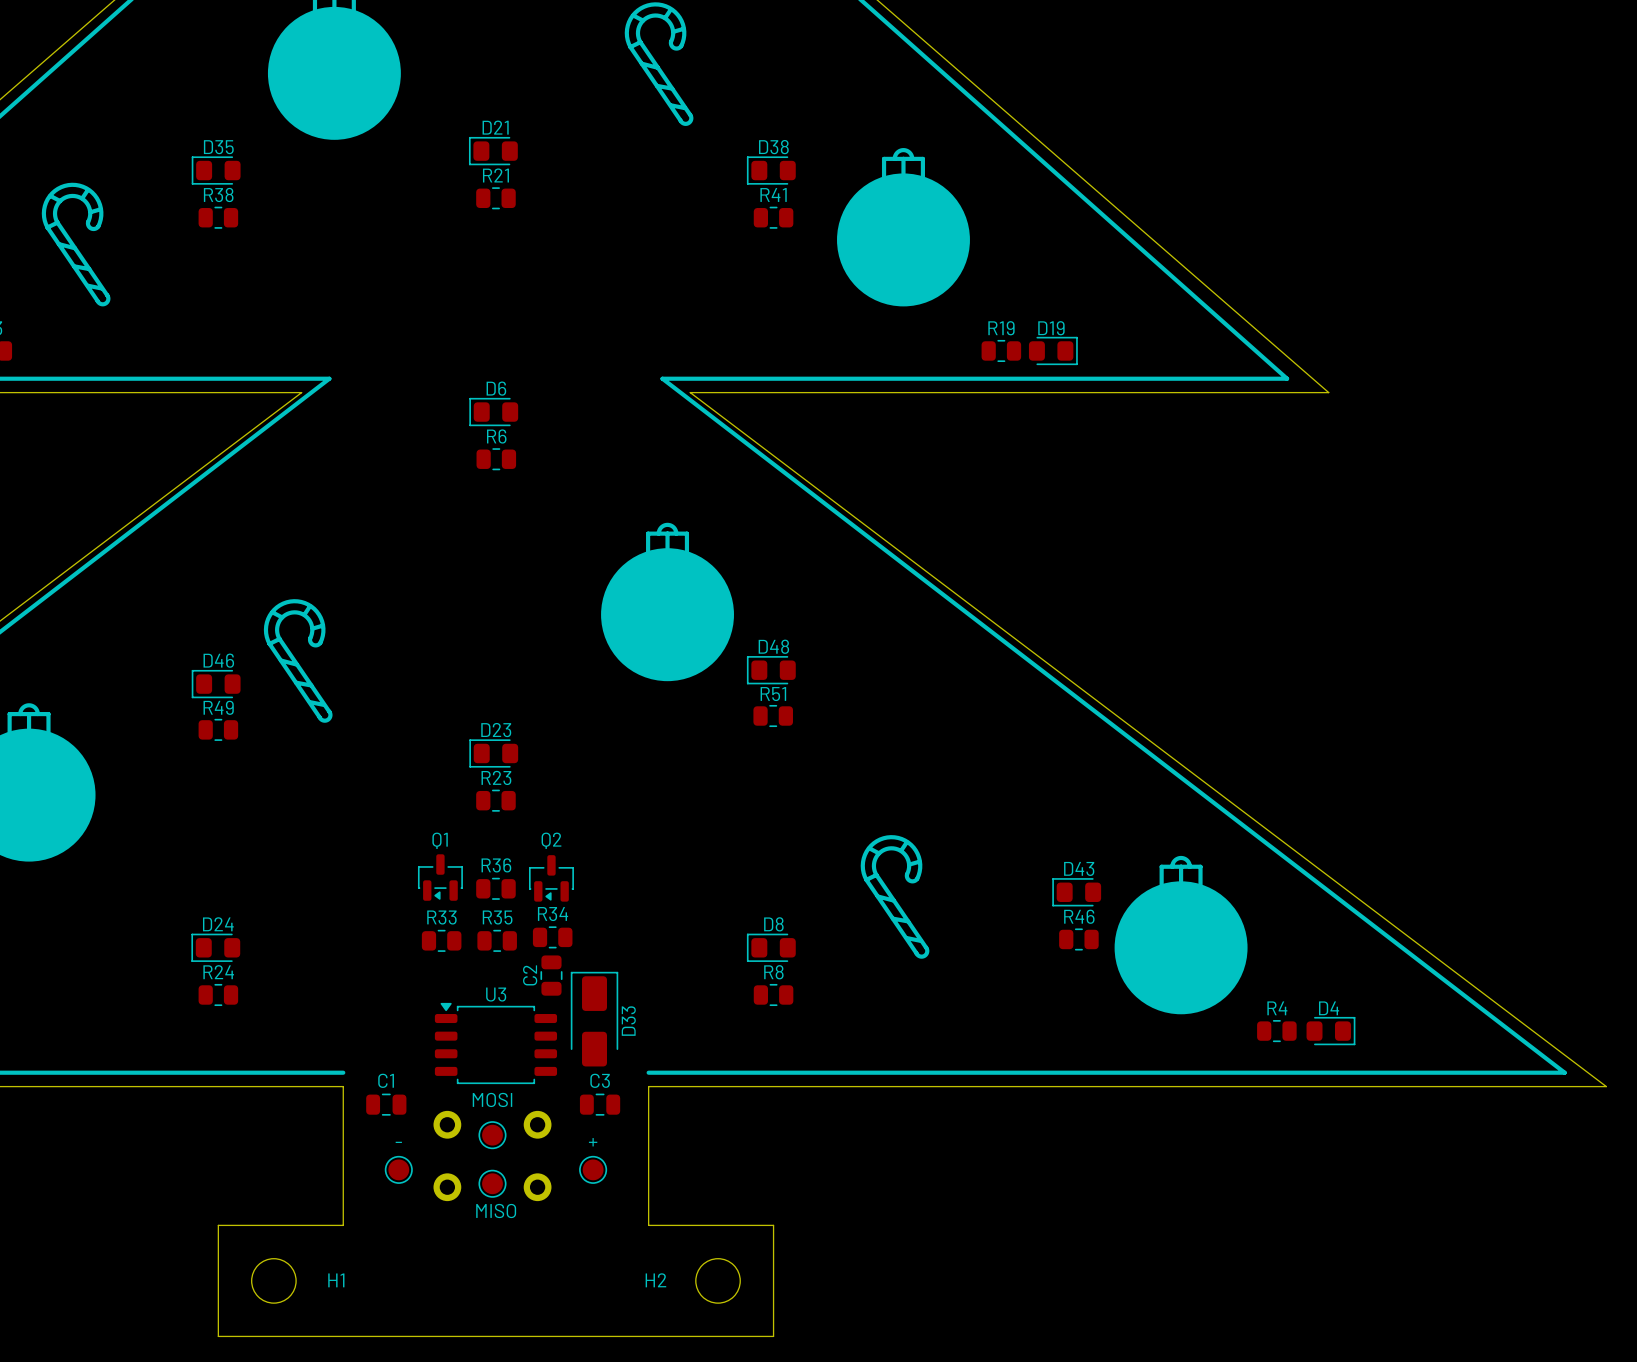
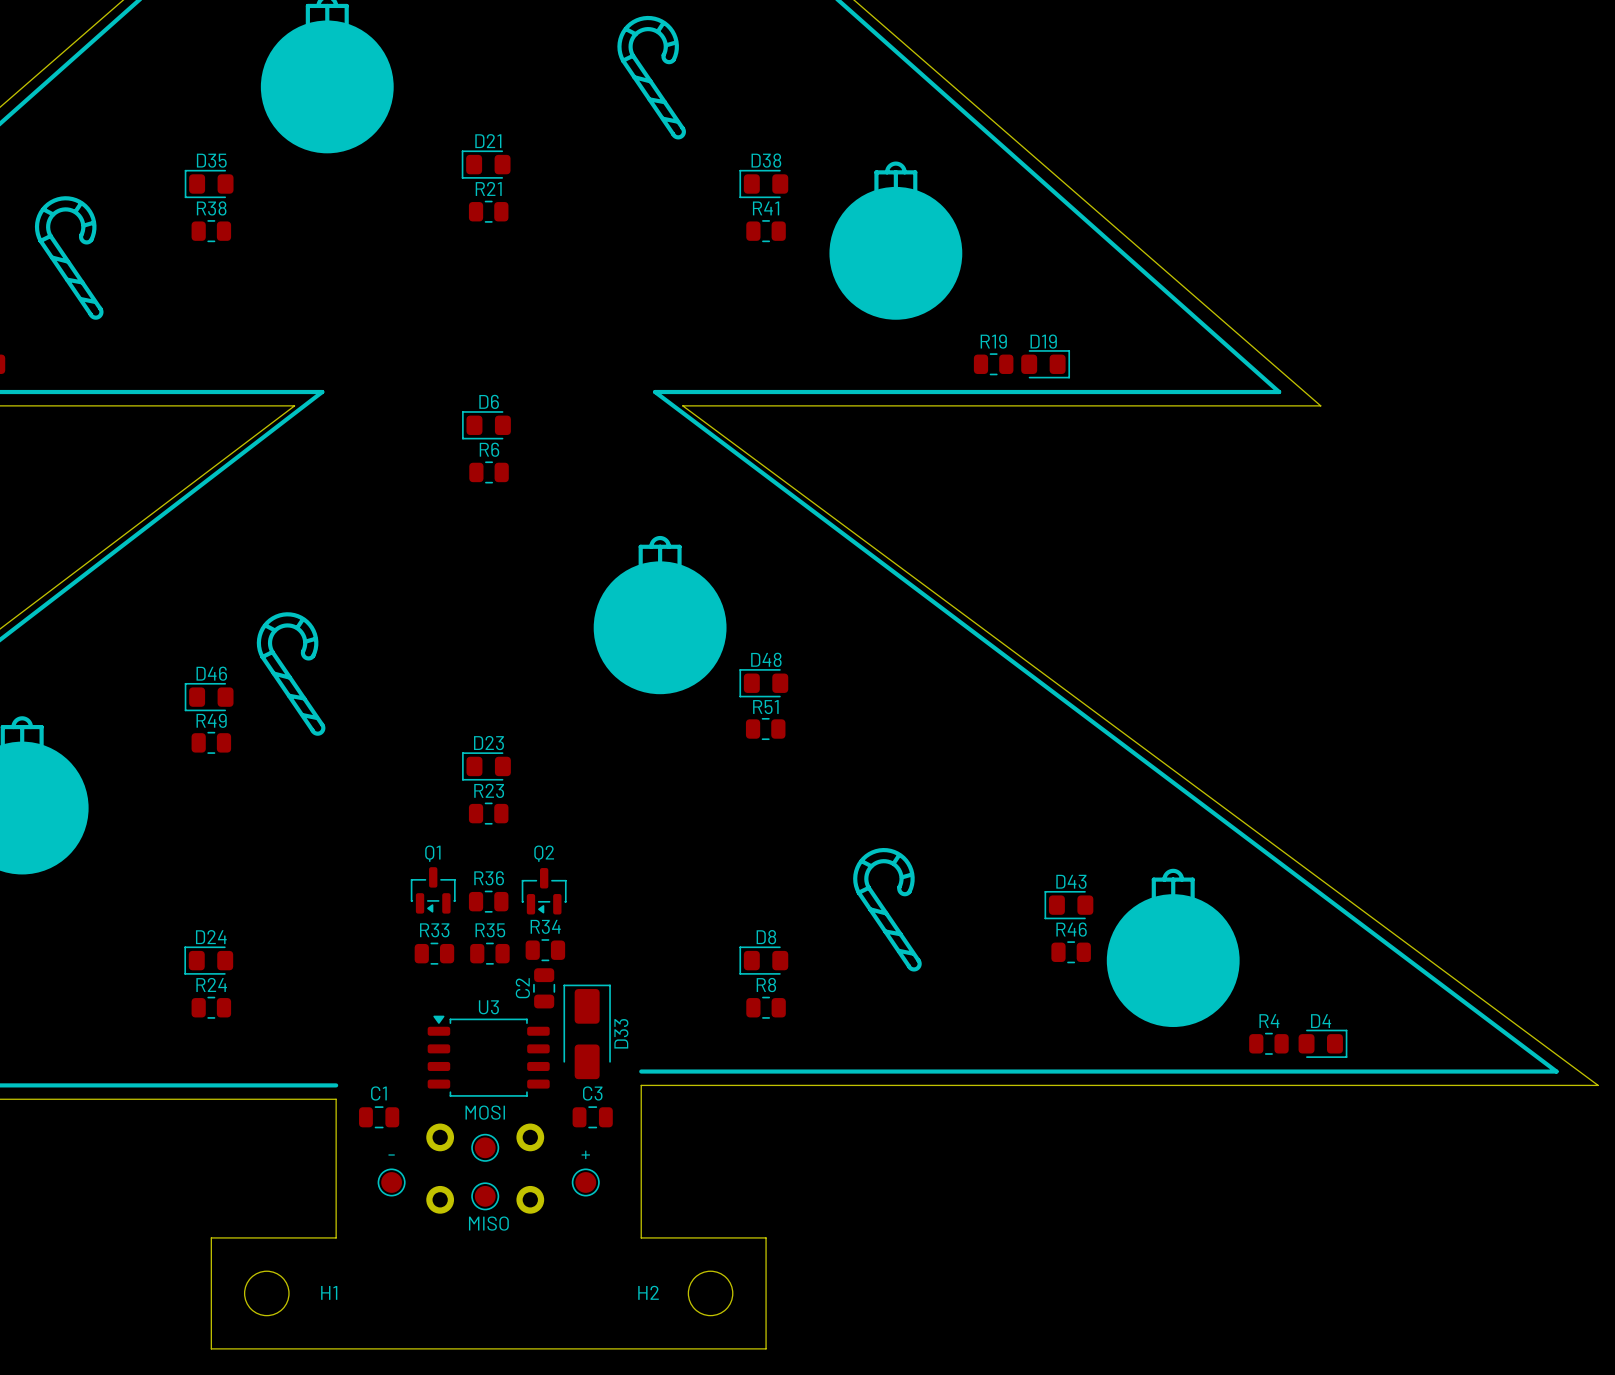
line: (662, 378) (1564, 1072) (648, 1072) -> (655, 392) (1556, 1071) (641, 1071)
board edge: (690, 392) (1606, 1086) (648, 1086) -> (682, 405) (1598, 1085) (641, 1085) (641, 1099)

